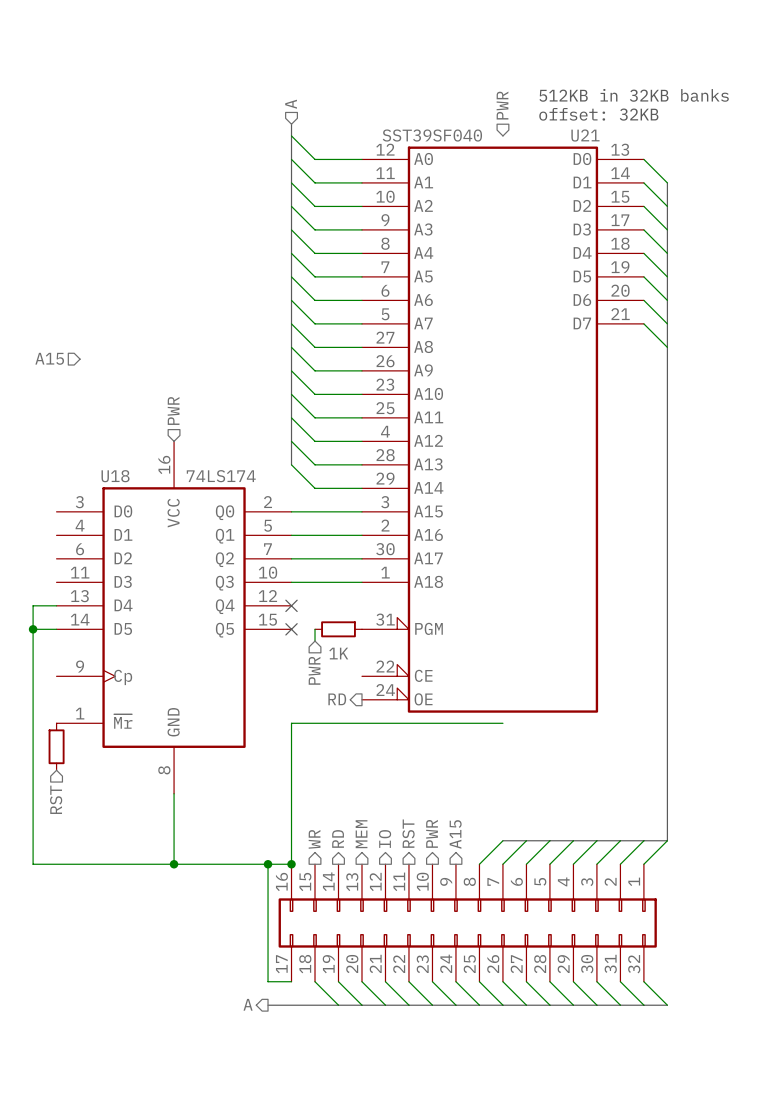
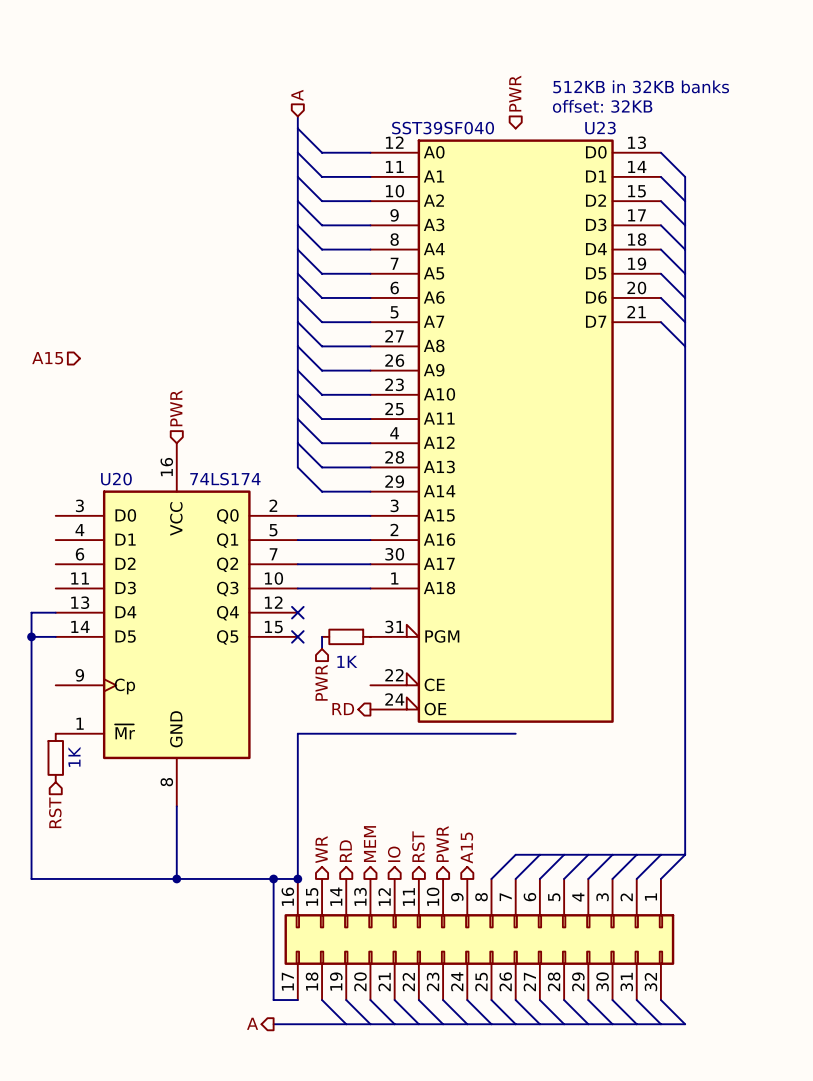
U21 name: U21 (585, 135) -> U23 (600, 128)
U18 name: U18 (115, 476) -> U20 (116, 479)
part value: none -> 1K (74, 756)

